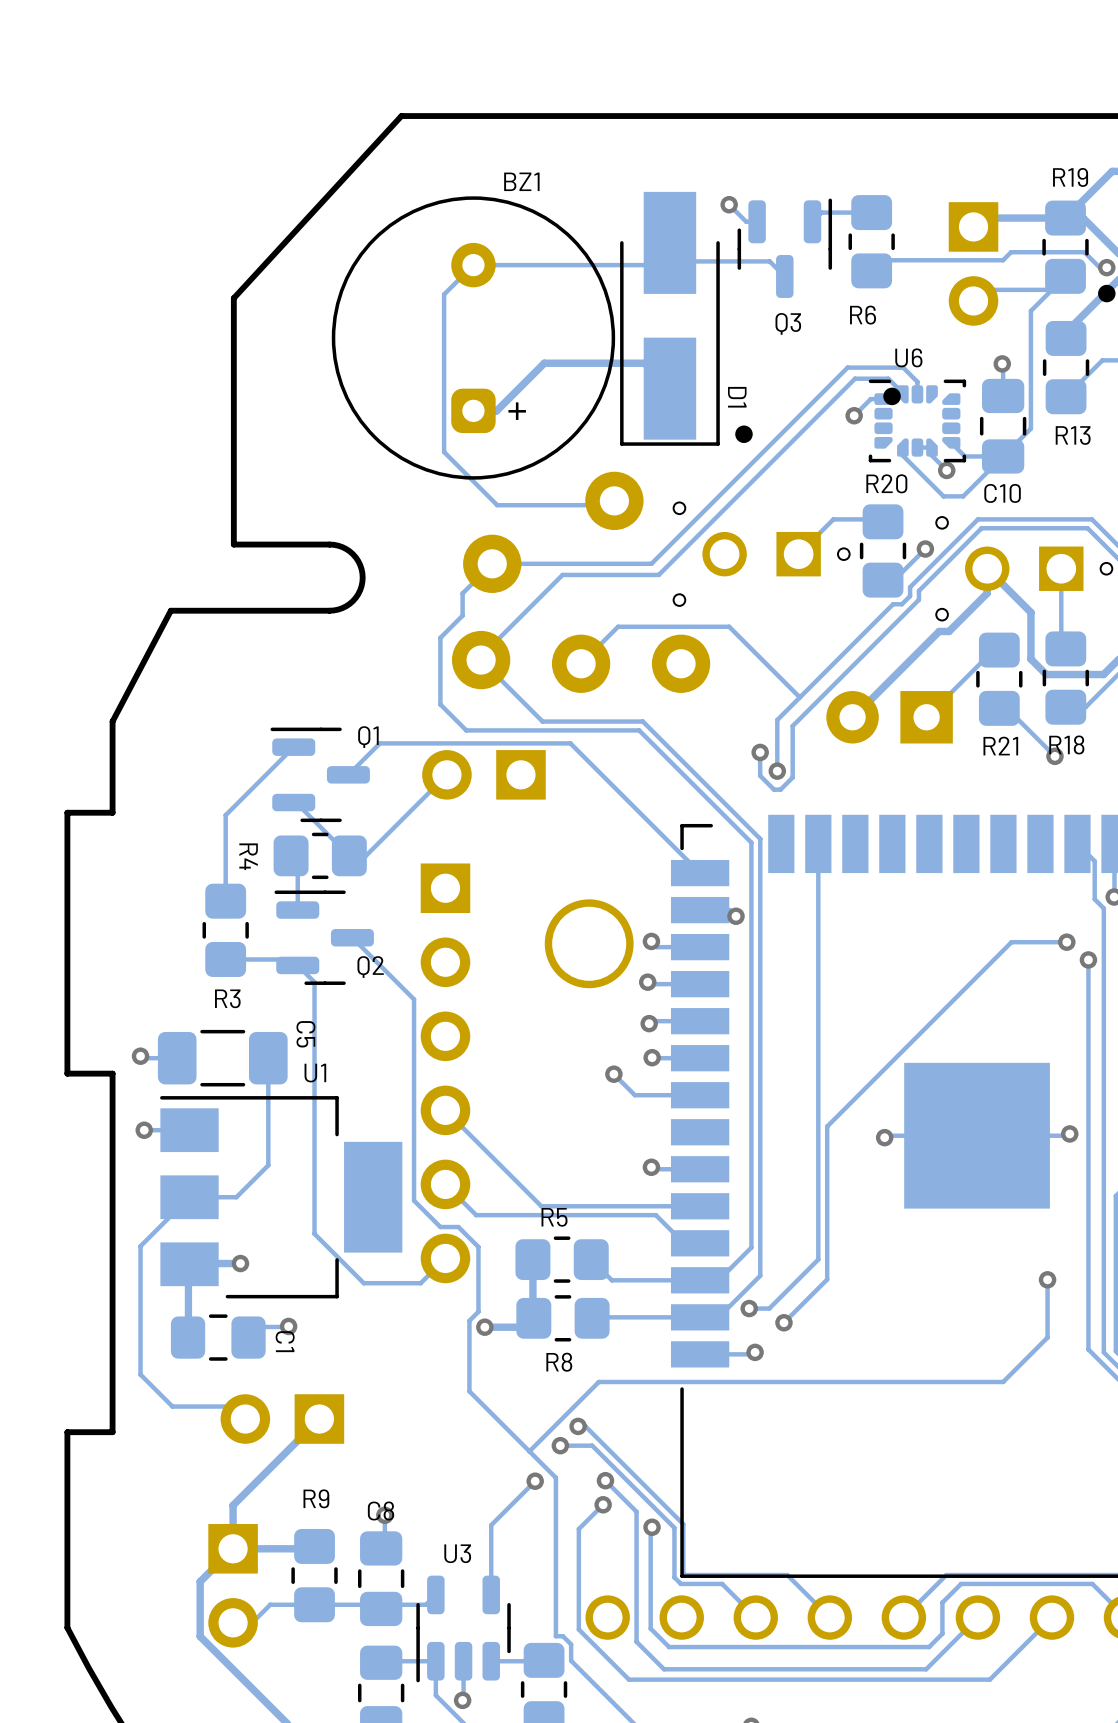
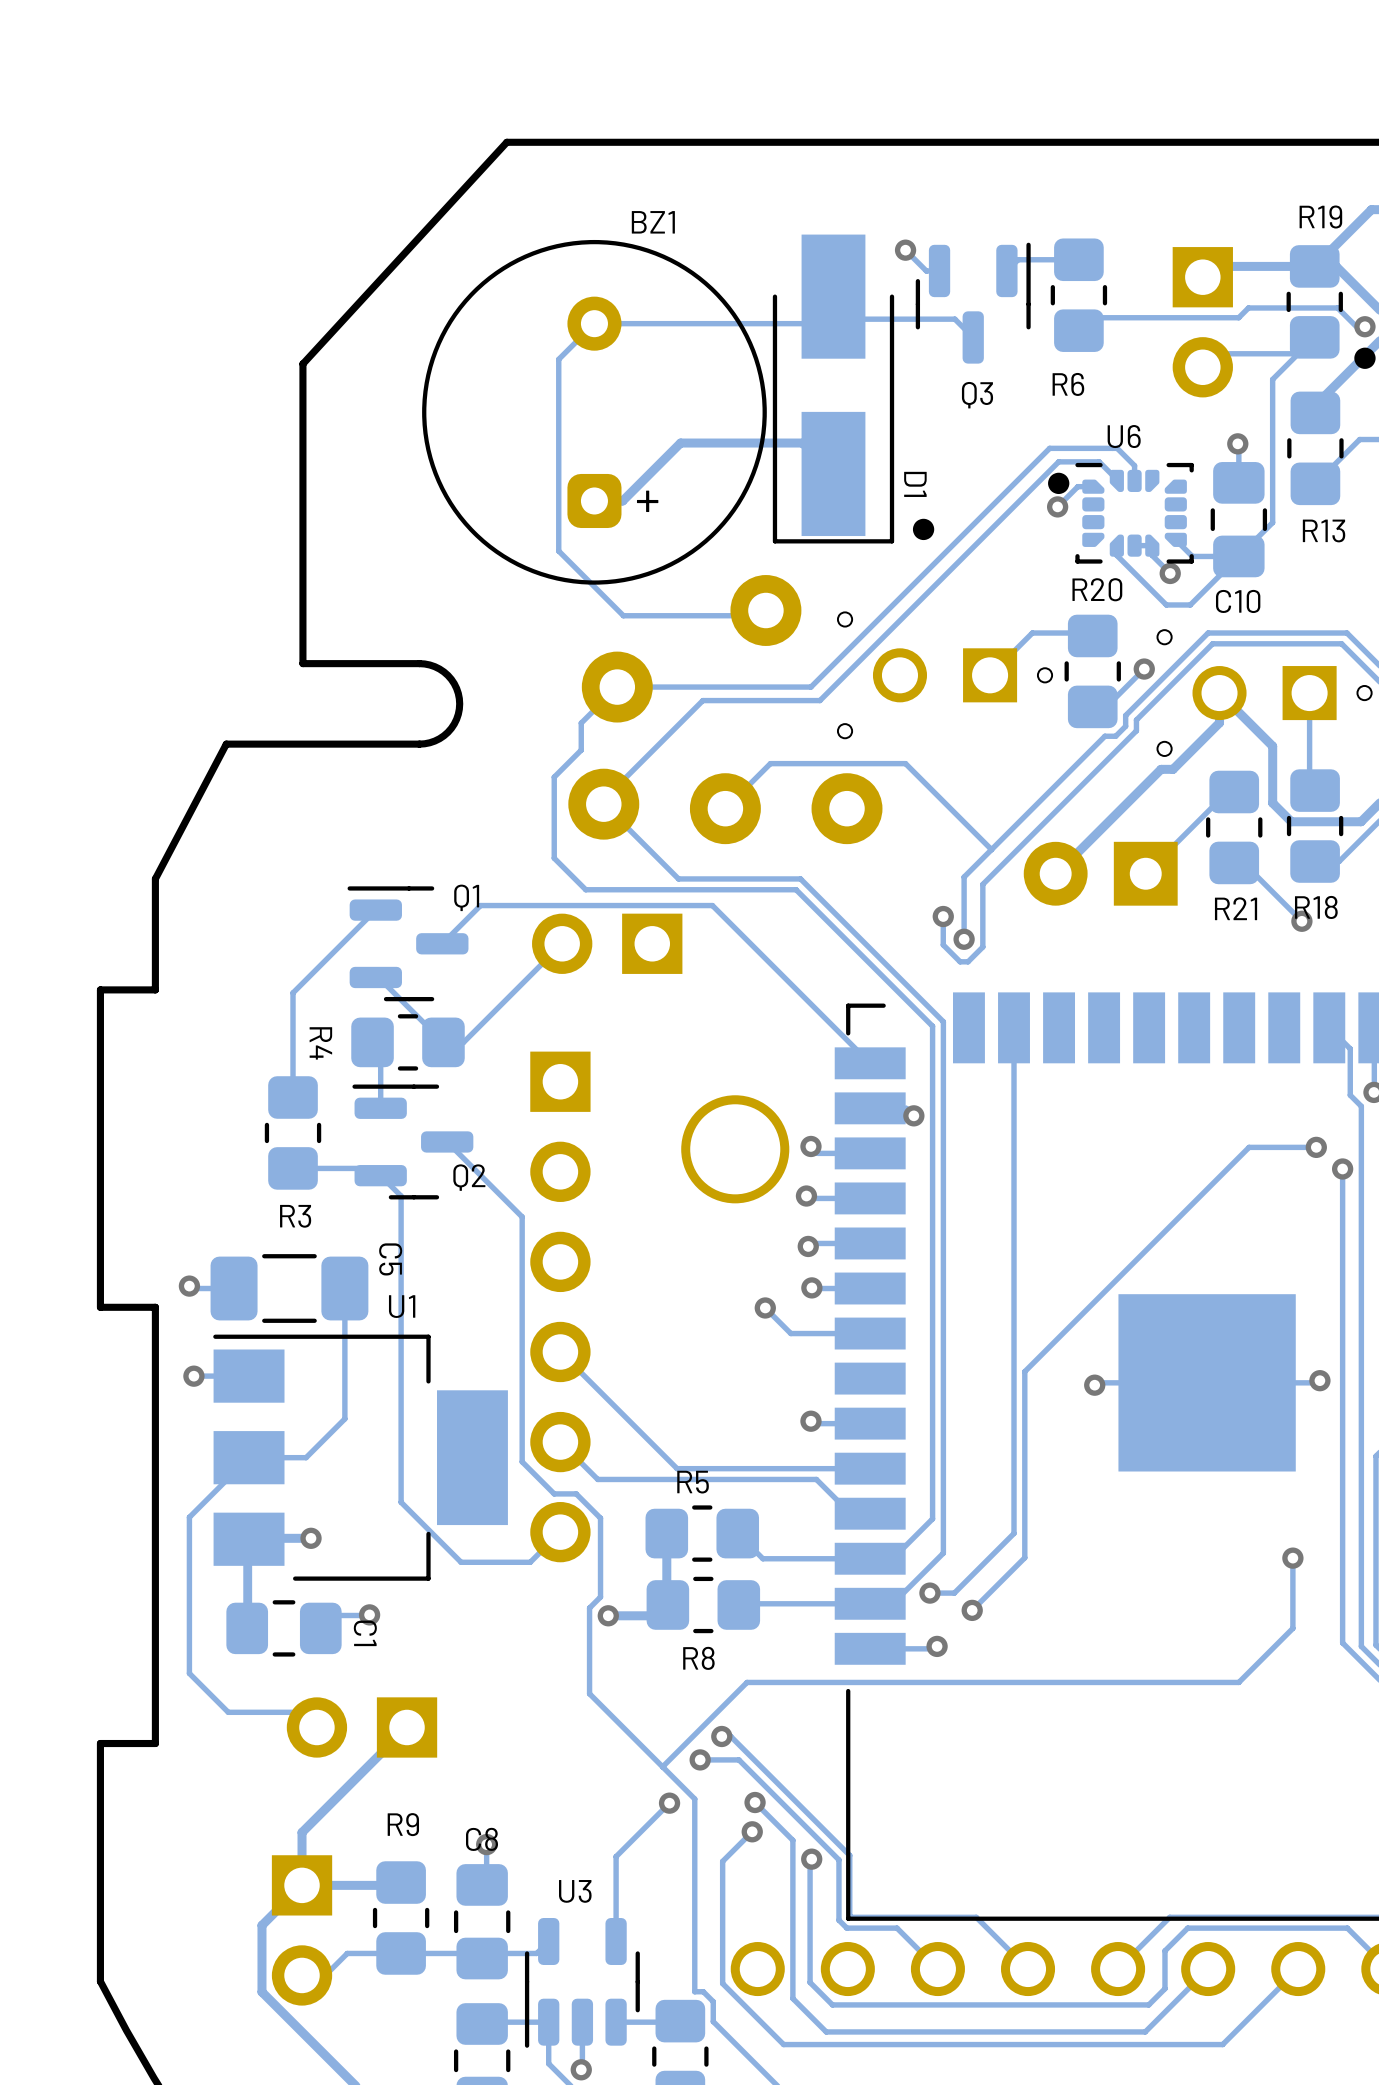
drawing position: (892, 396) -> (1058, 483)

